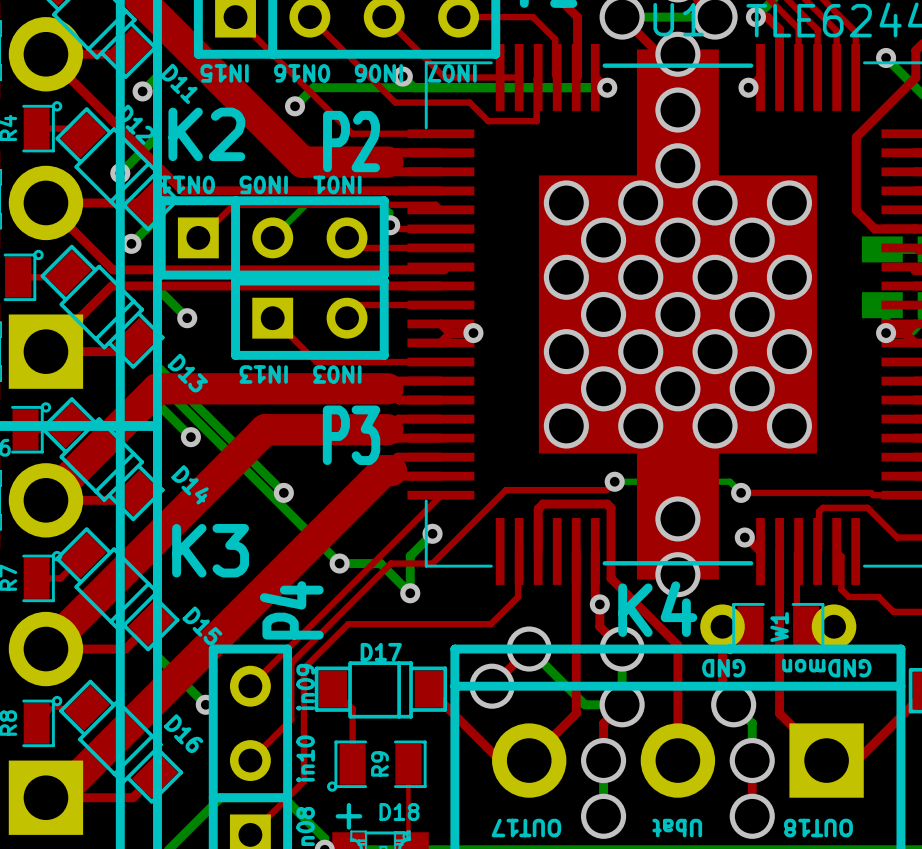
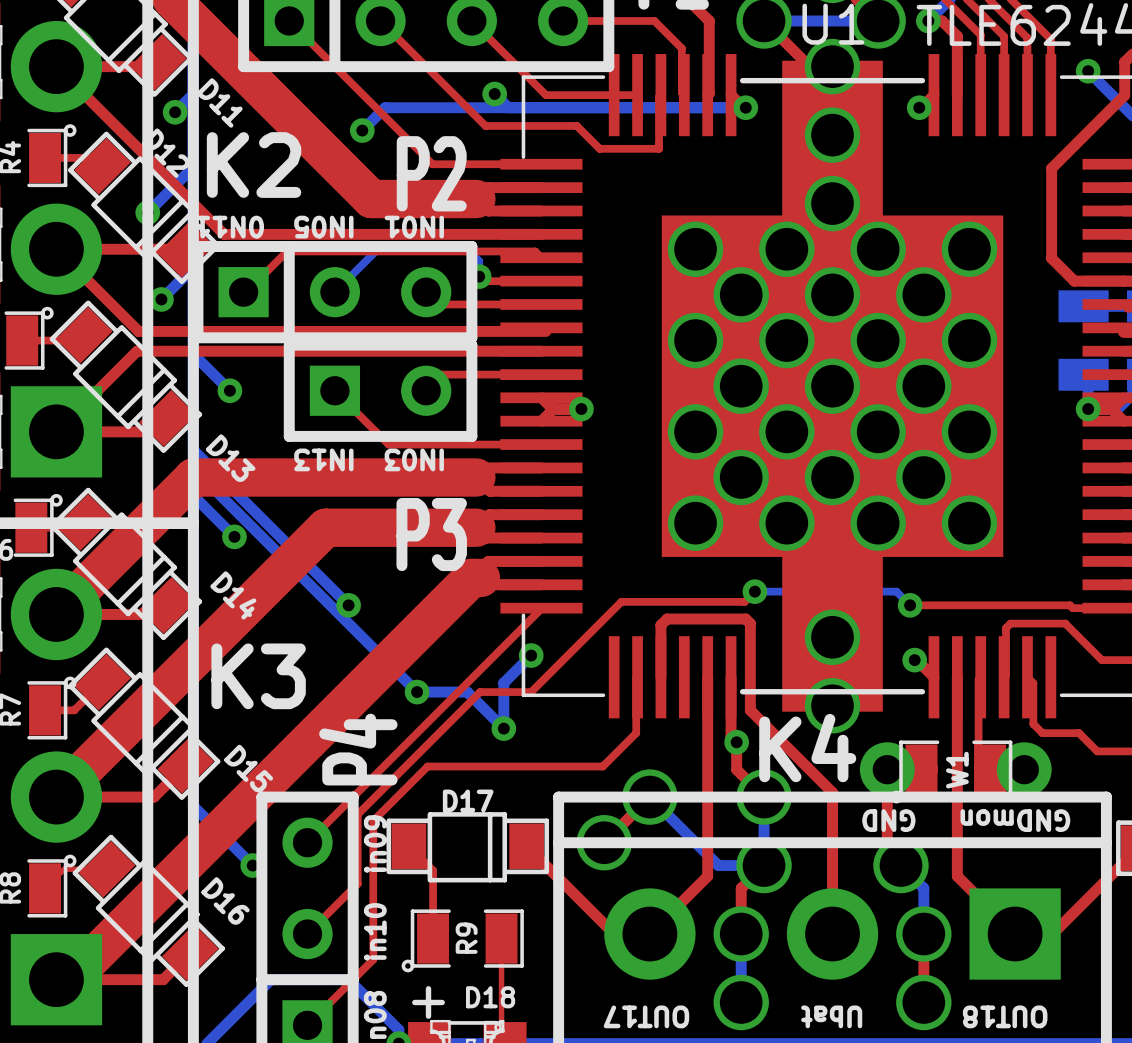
text: IN07 IN06 0N16 IN15 (338, 73) -> none

